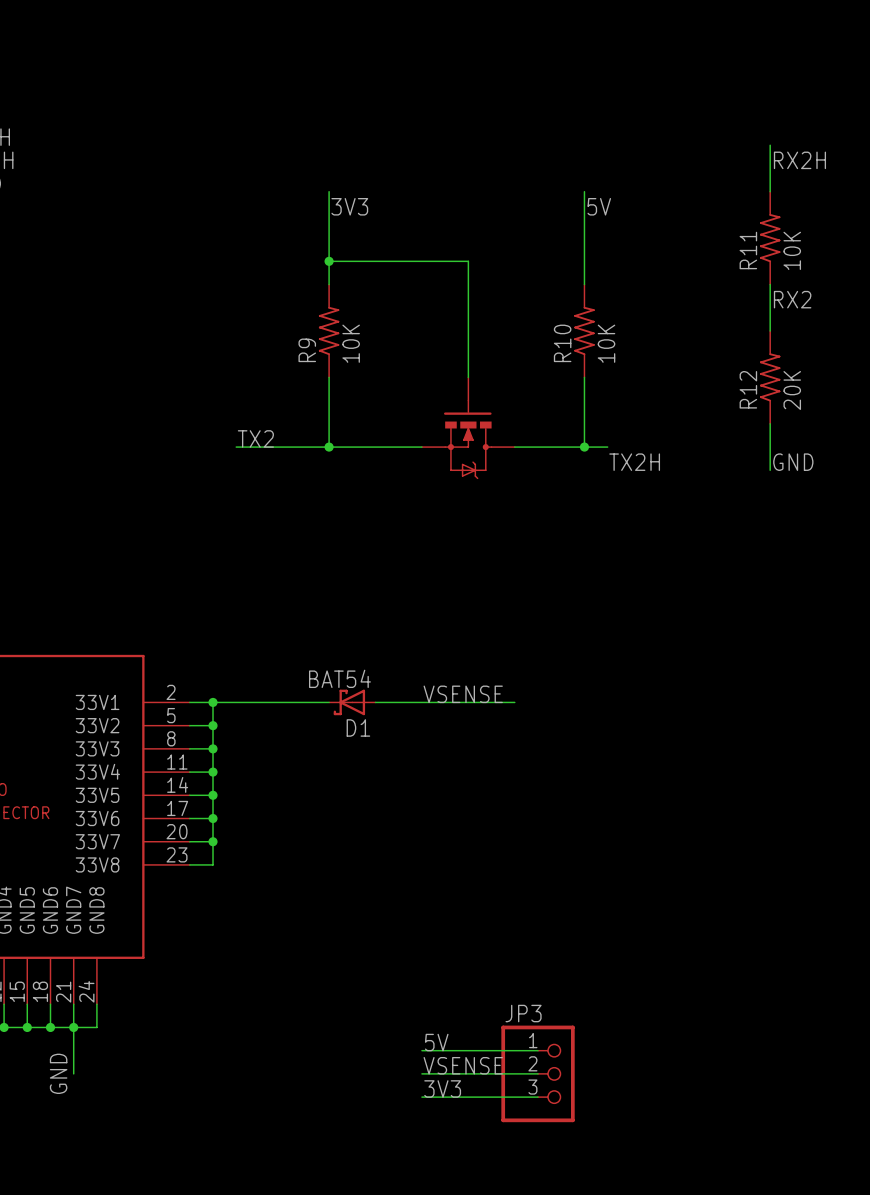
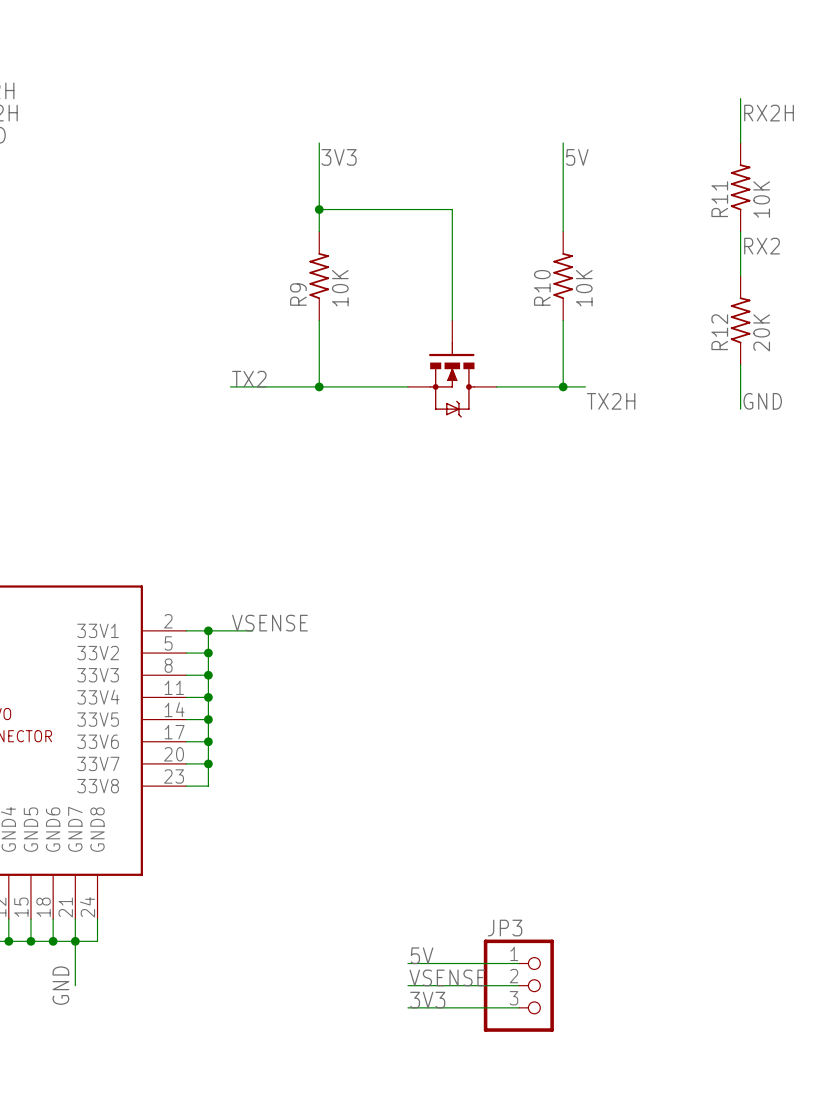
label position: VSENSE (463, 694) -> VSENSE (269, 623)
wire: (259, 702) (329, 702) -> none
D1: BAT54 (352, 702) -> none
wire: (375, 702) (514, 702) -> none

